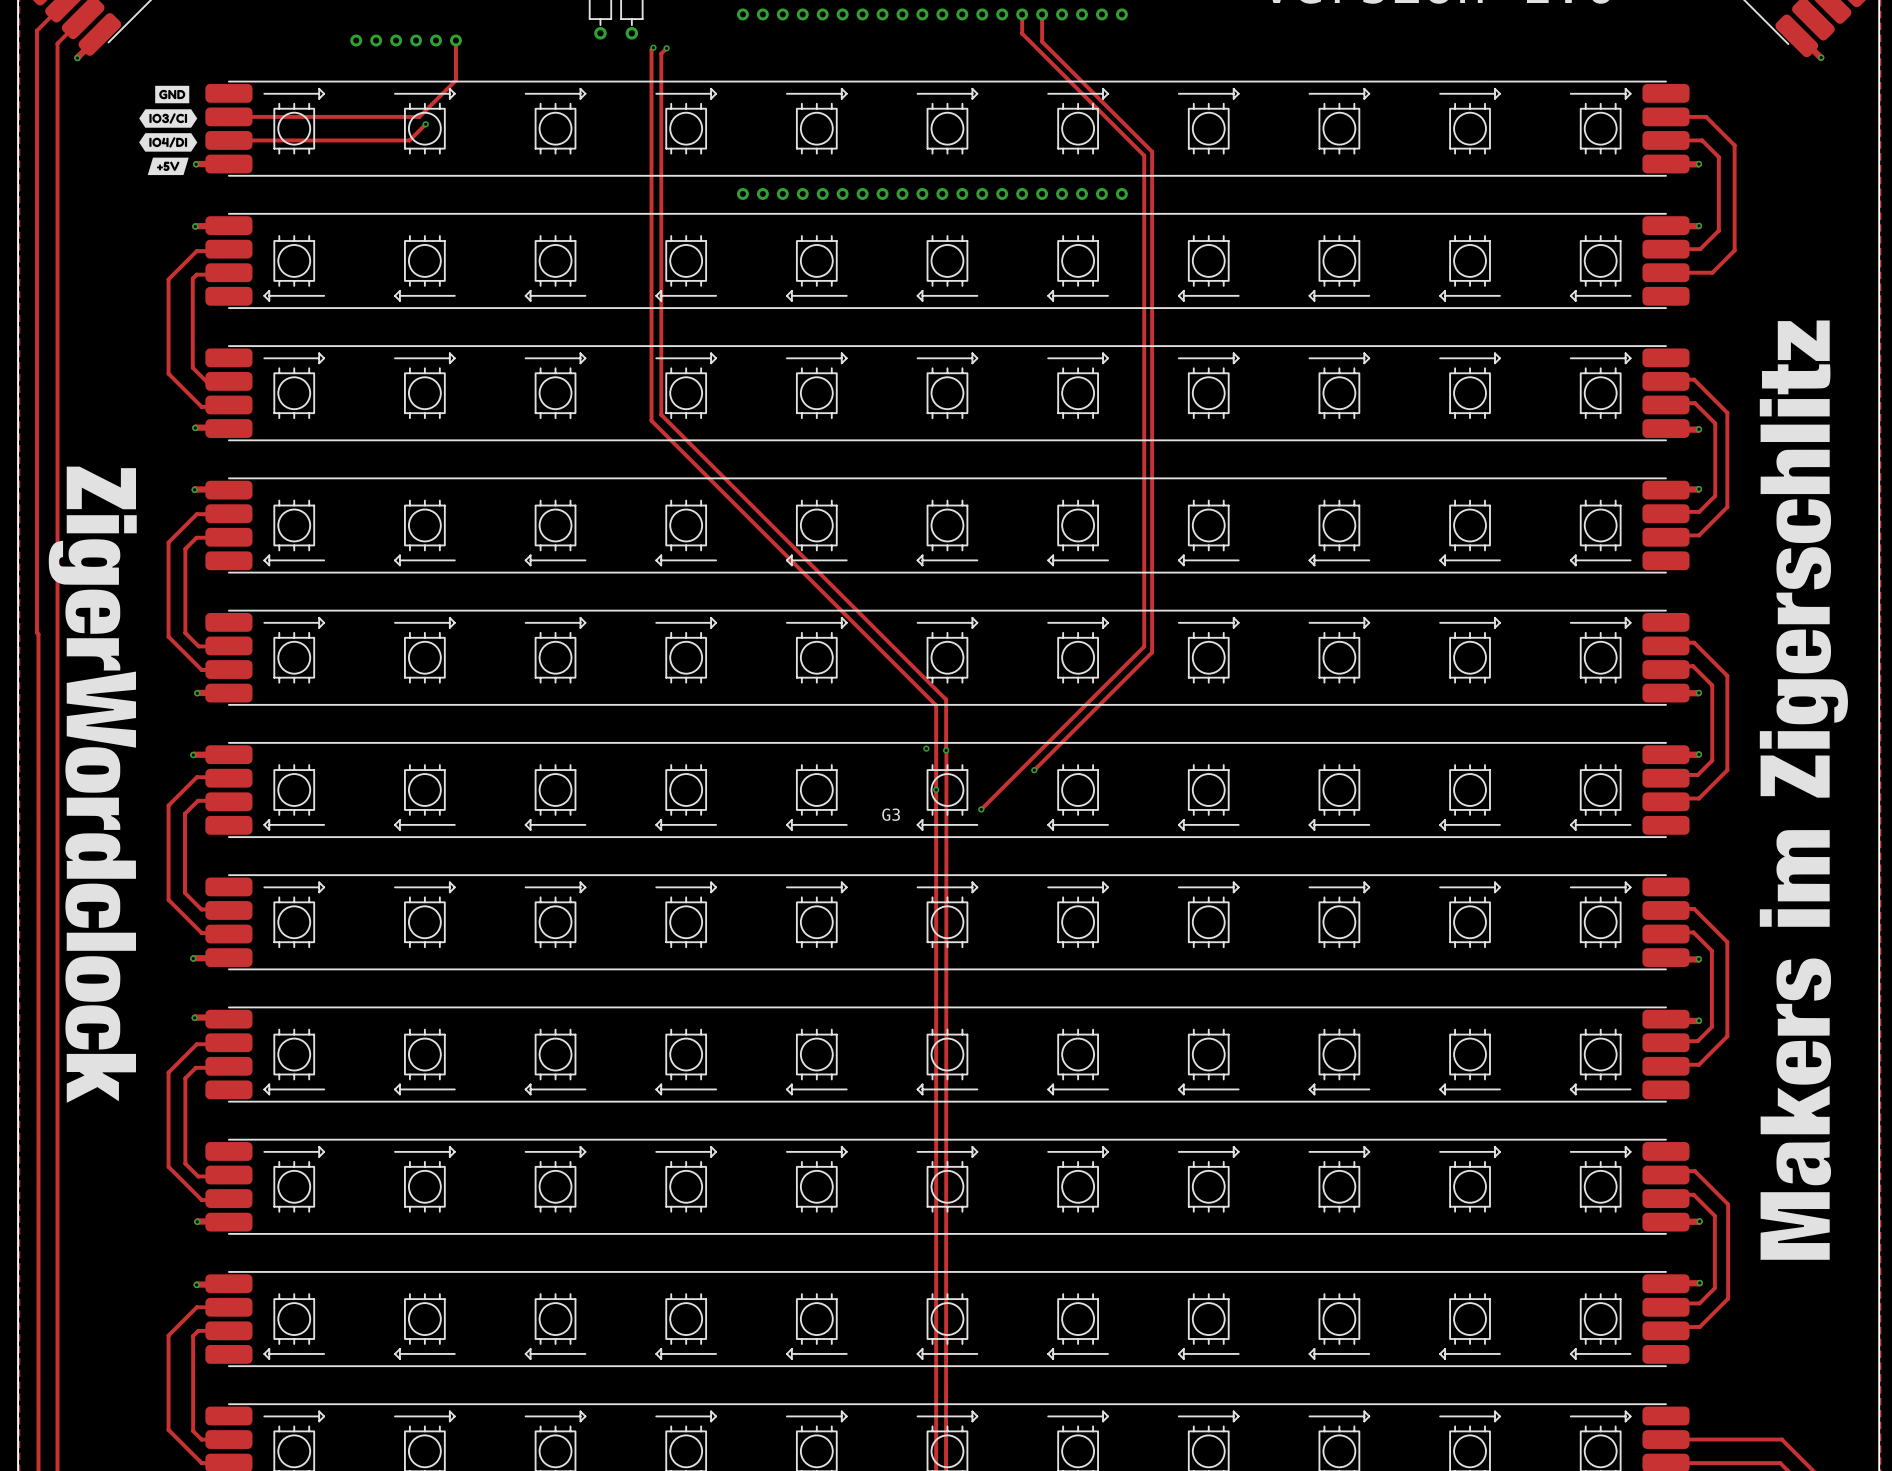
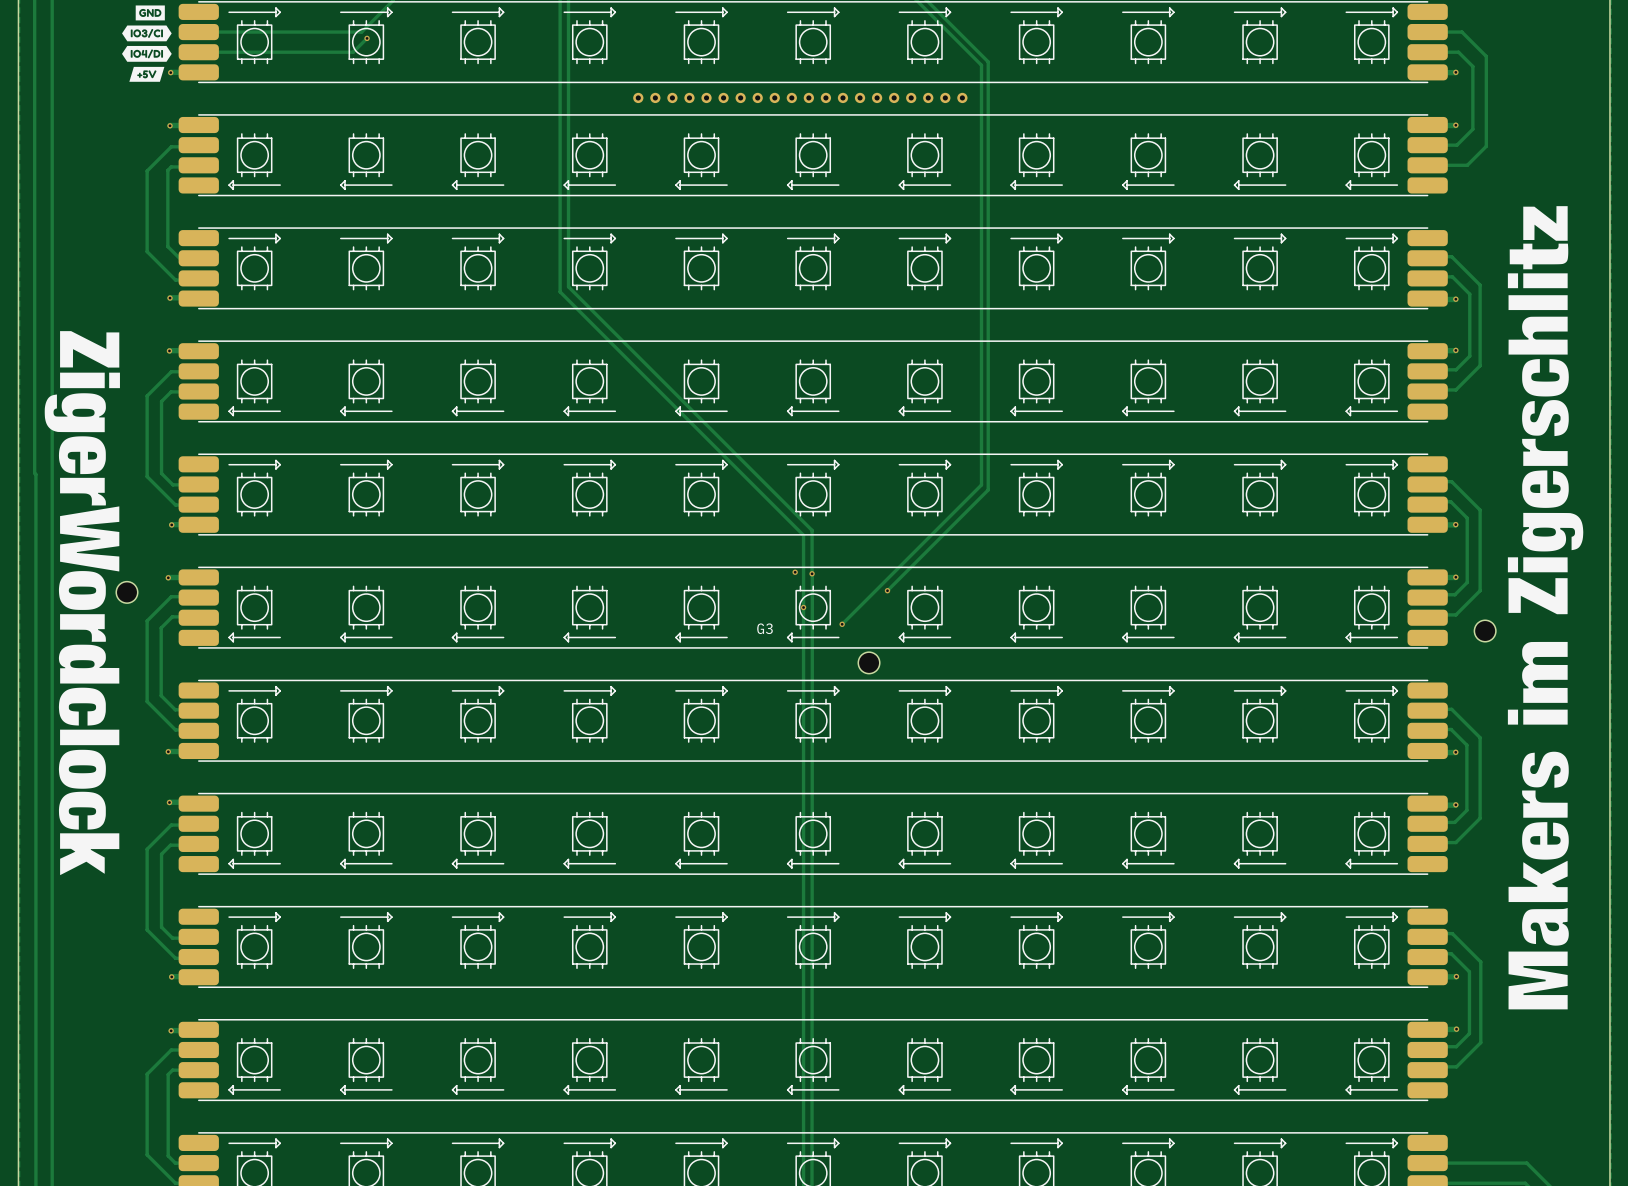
part: none -> (126, 592)
part: none -> (1485, 631)
part: none -> (869, 662)

